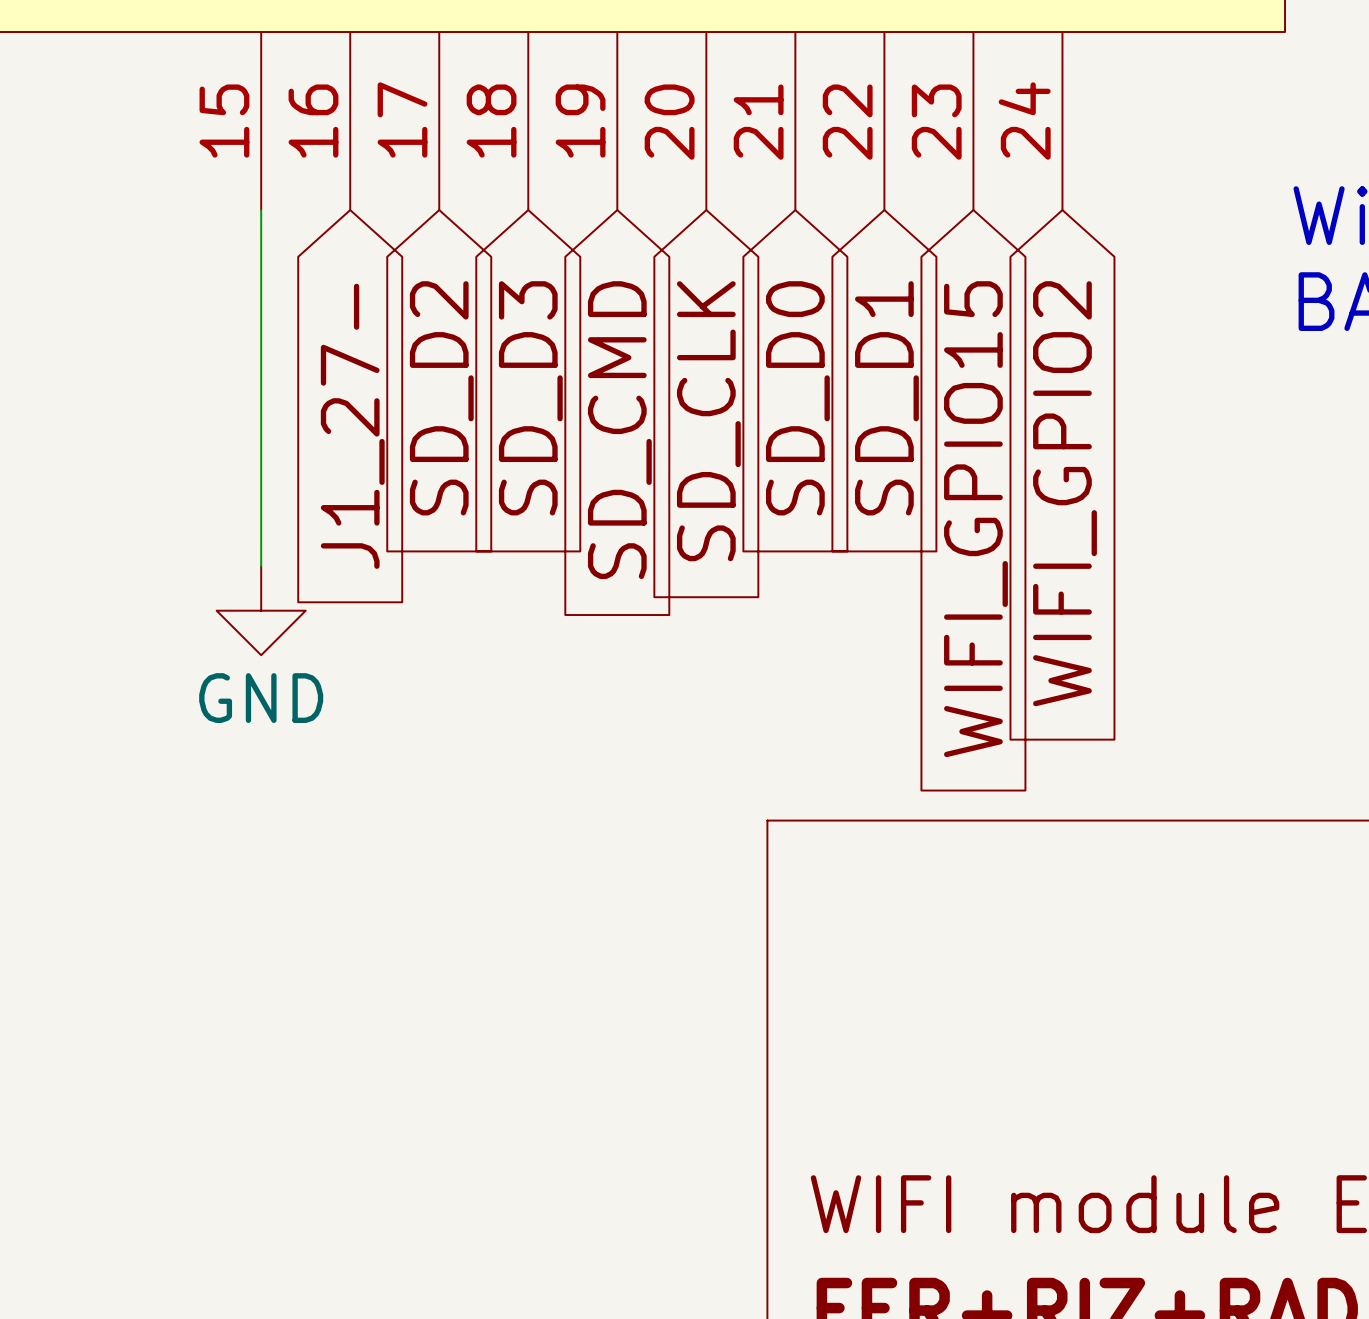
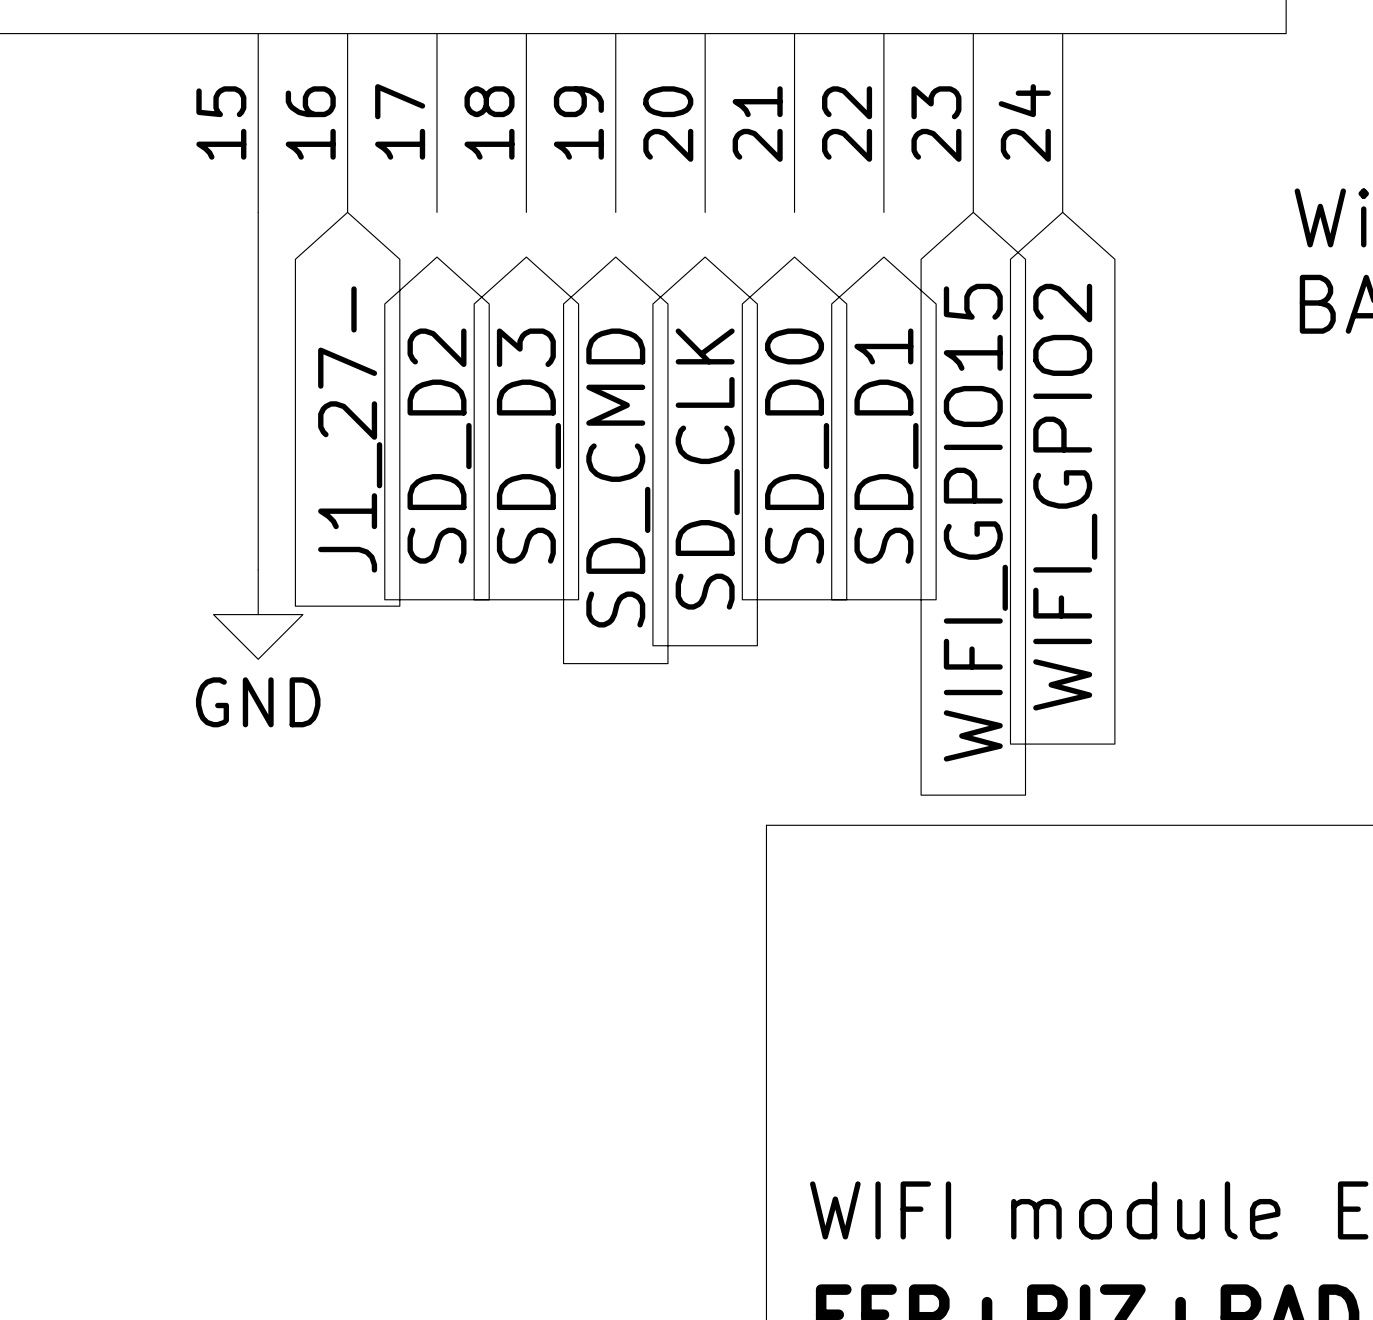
global label position: SD_D2 (441, 398) -> SD_D2 (439, 446)
global label position: SD_D3 (530, 398) -> SD_D3 (528, 446)
global label position: SD_D0 (797, 398) -> SD_D0 (797, 446)
global label position: SD_D1 (886, 398) -> SD_D1 (886, 446)
global label position: SD_CLK (708, 421) -> SD_CLK (707, 469)
global label position: SD_CMD (619, 430) -> SD_CMD (618, 477)

